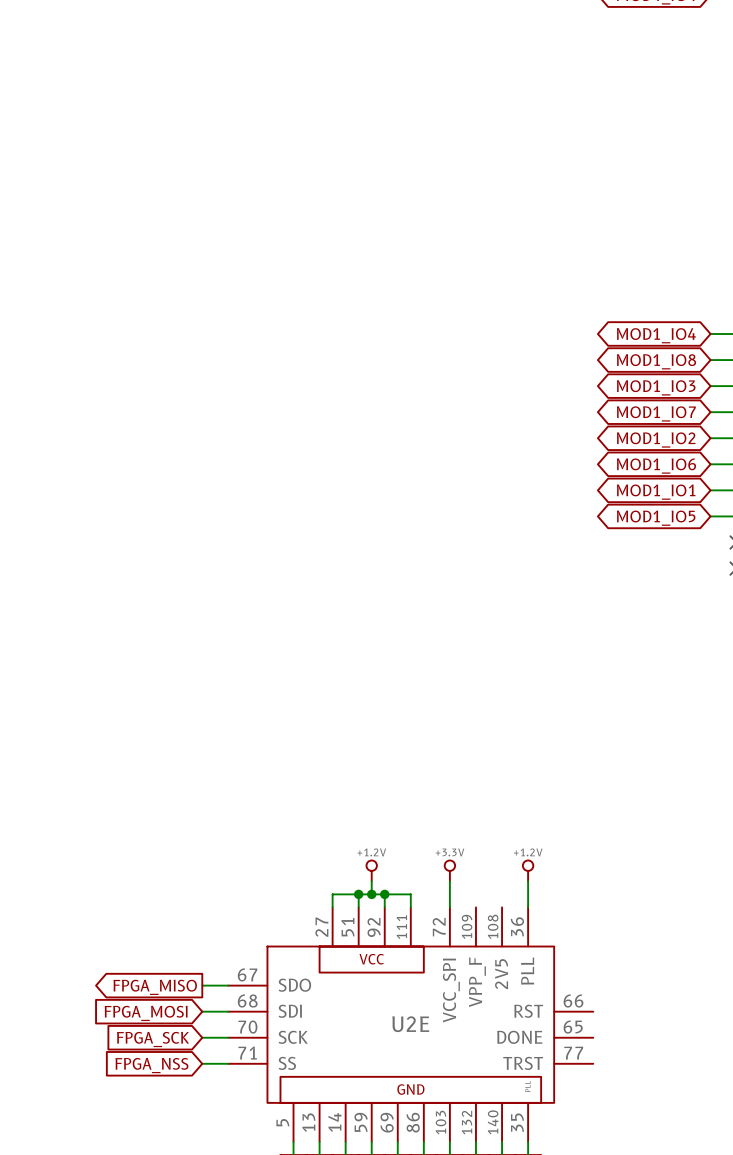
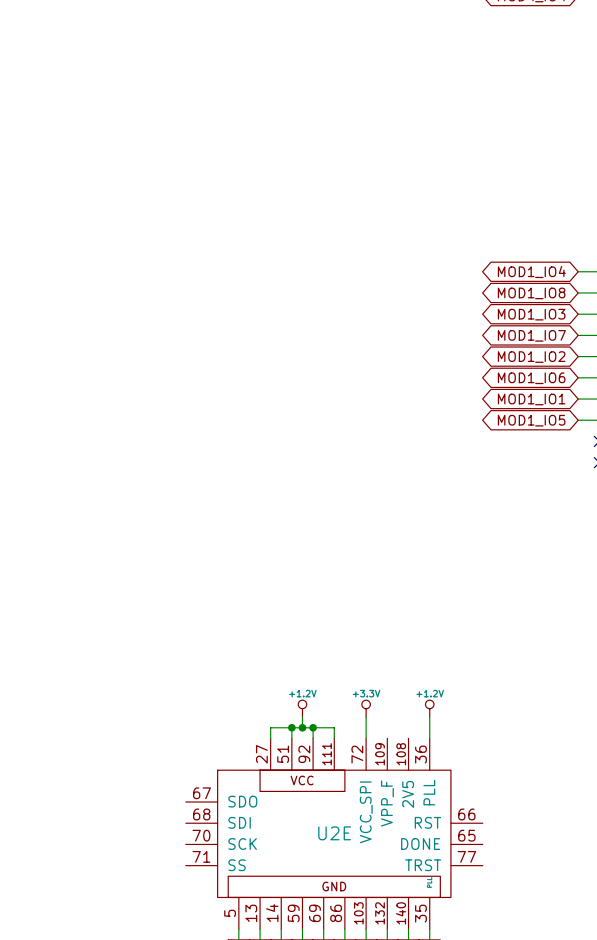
wire: (202, 985) (228, 985) -> none
global label: FPGA_MISO (155, 987) -> none
wire: (202, 1011) (228, 1011) -> none
global label: FPGA_MOSI (146, 1013) -> none
wire: (202, 1037) (228, 1037) -> none
global label: FPGA_SCK (153, 1039) -> none
wire: (202, 1063) (228, 1063) -> none
global label: FPGA_NSS (151, 1065) -> none

